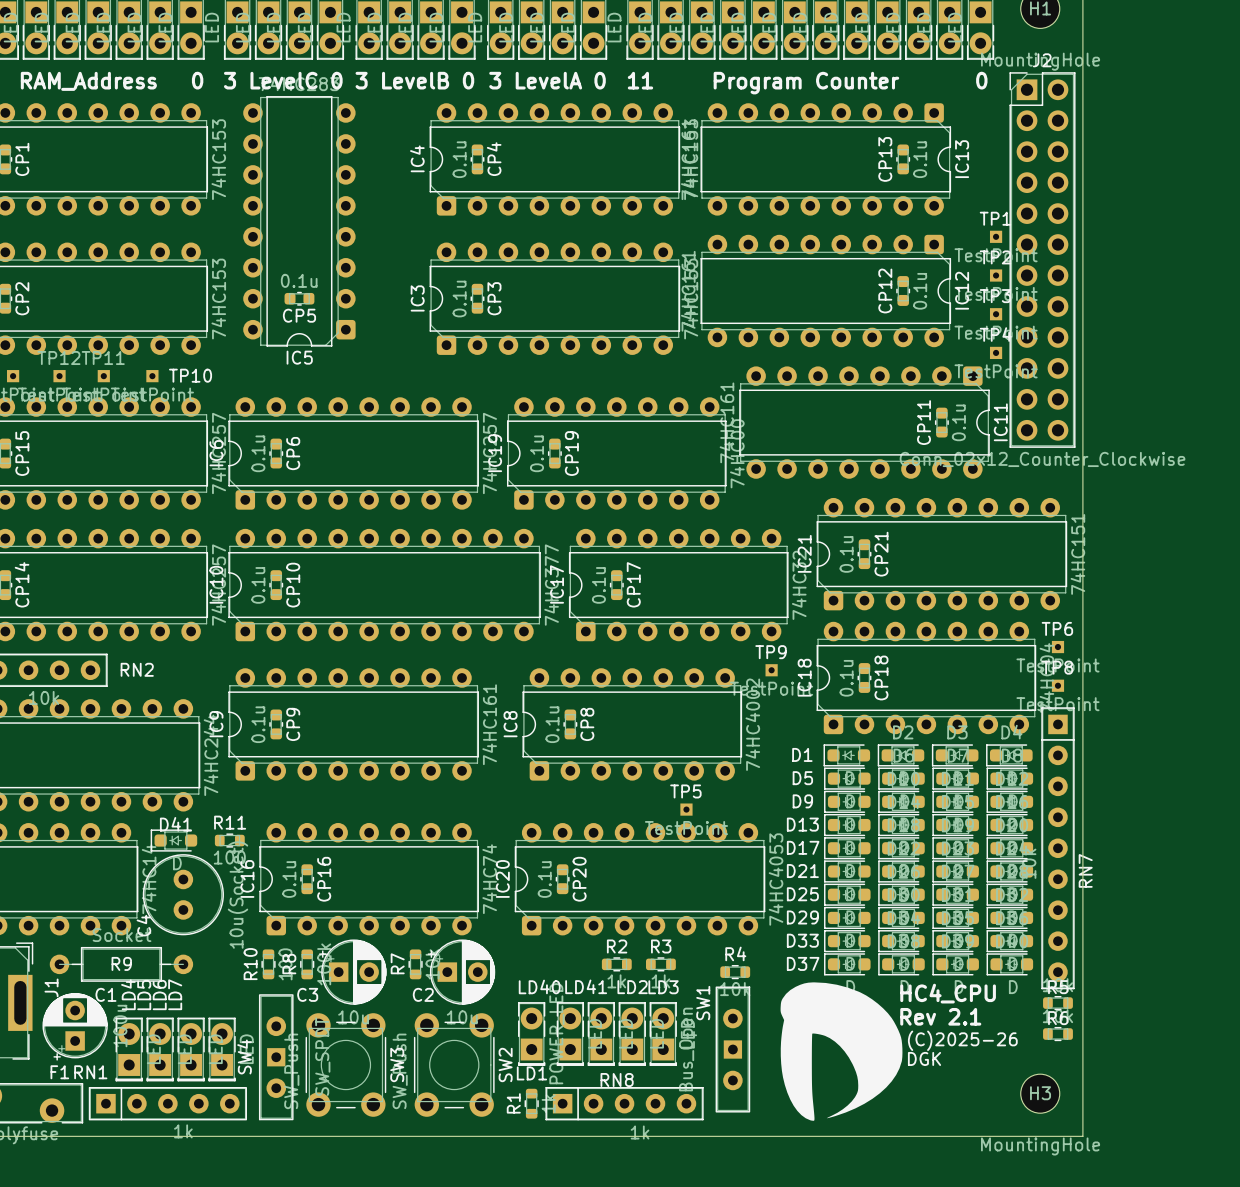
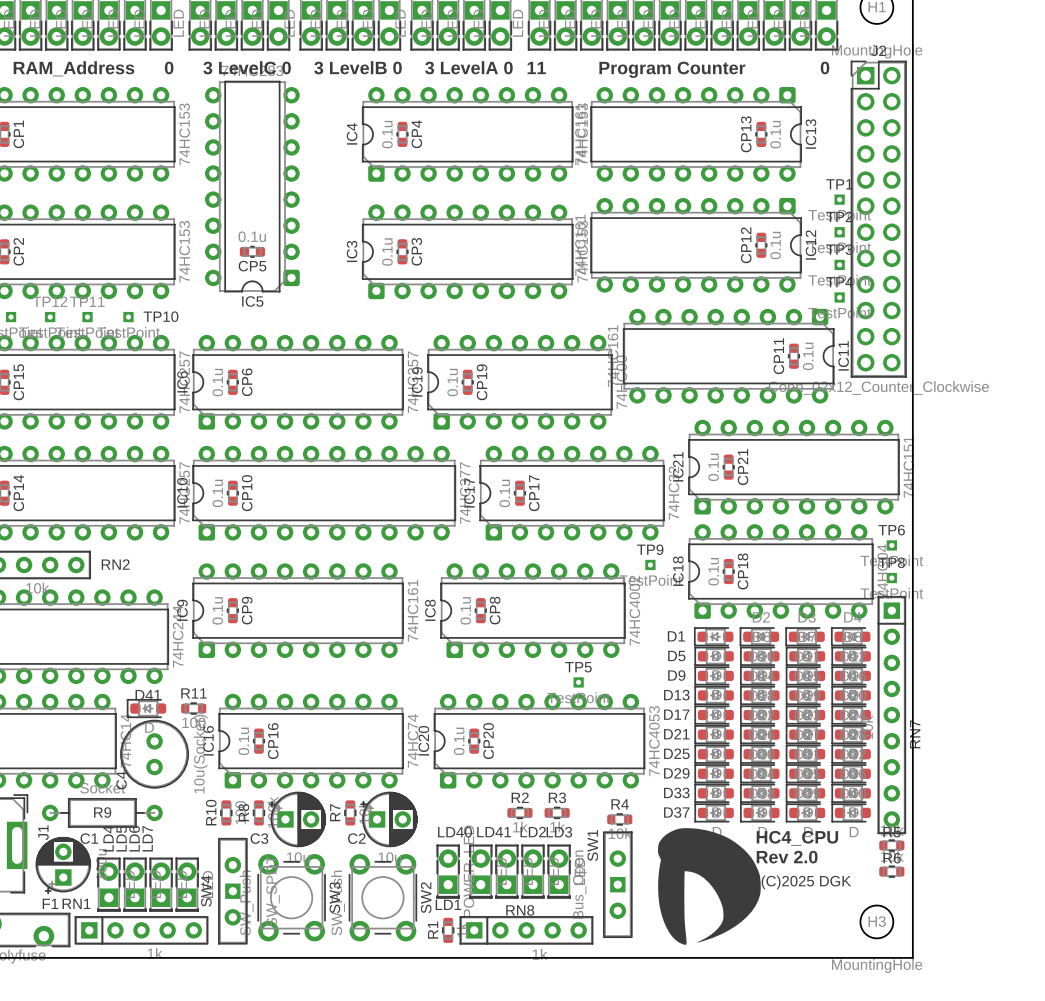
text: Rev 2.1 (940, 1016) -> Rev 2.0 (787, 857)
text: (C)2025-26 (962, 1040) -> (C)2025 DGK (806, 882)
text: DGK (924, 1058) -> none

